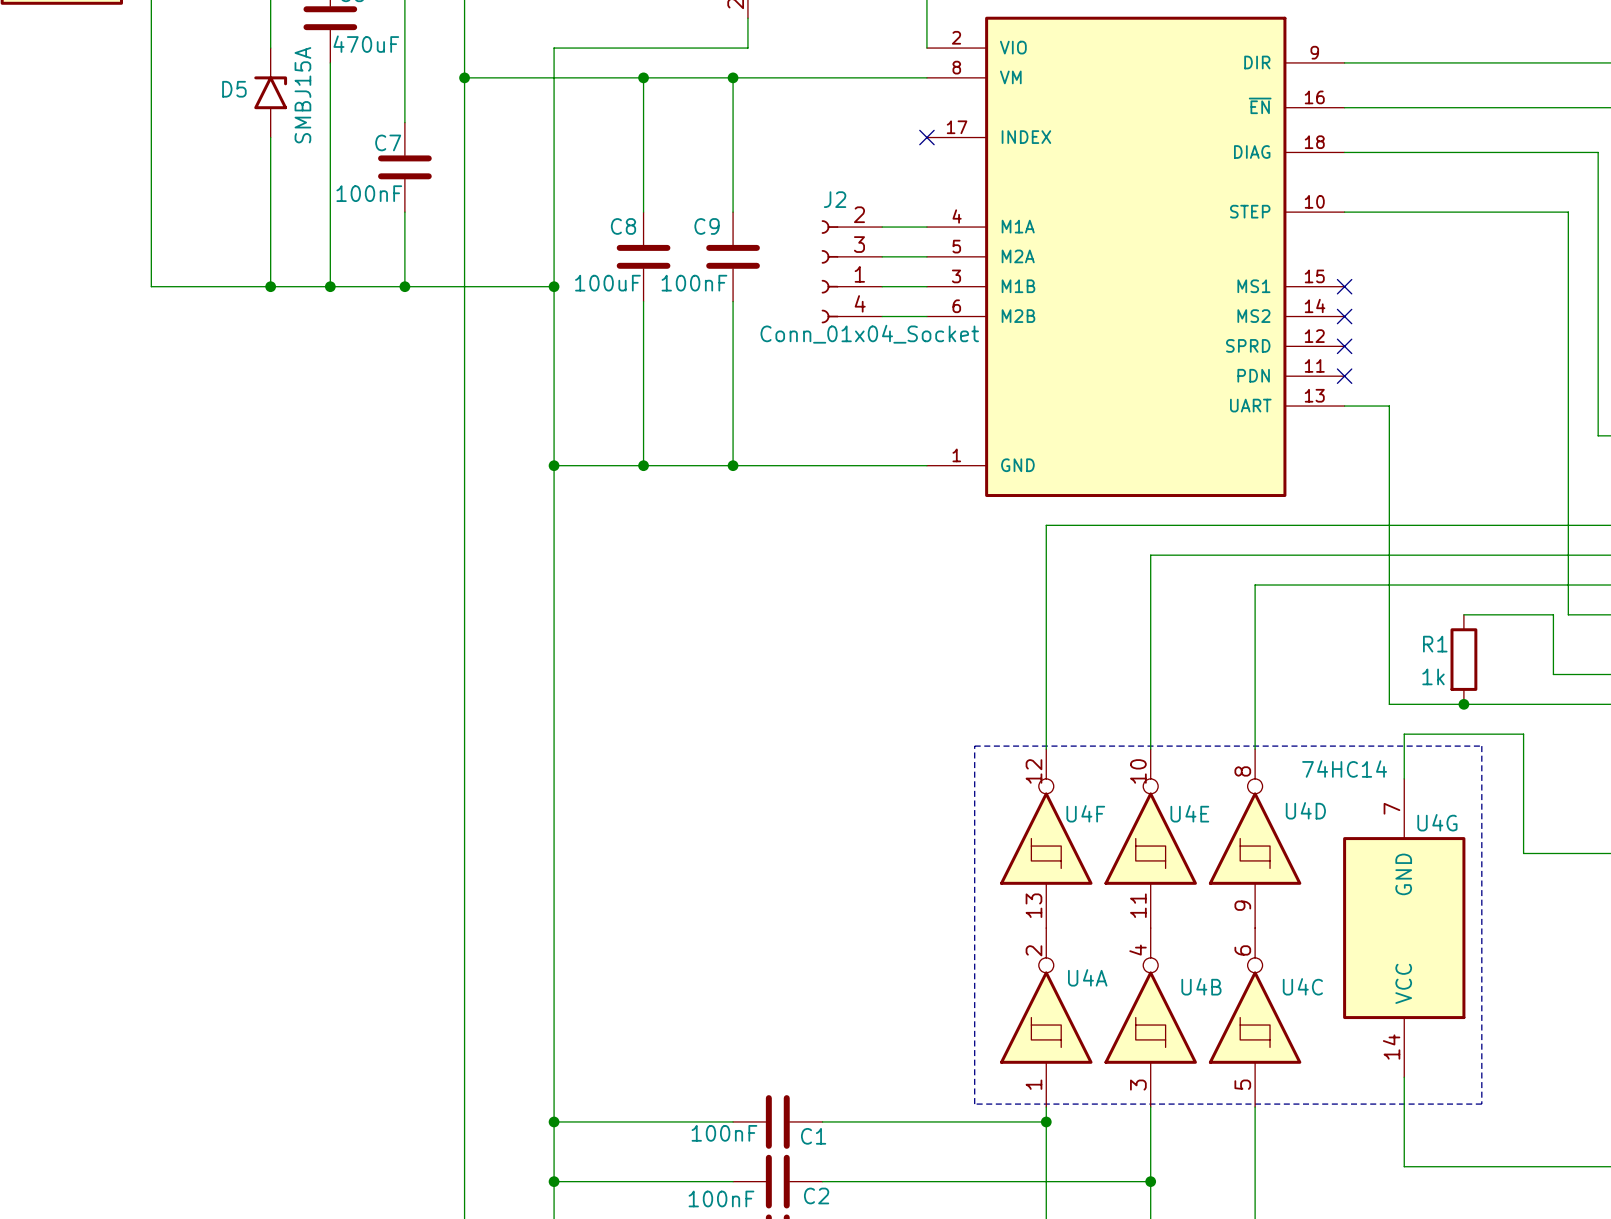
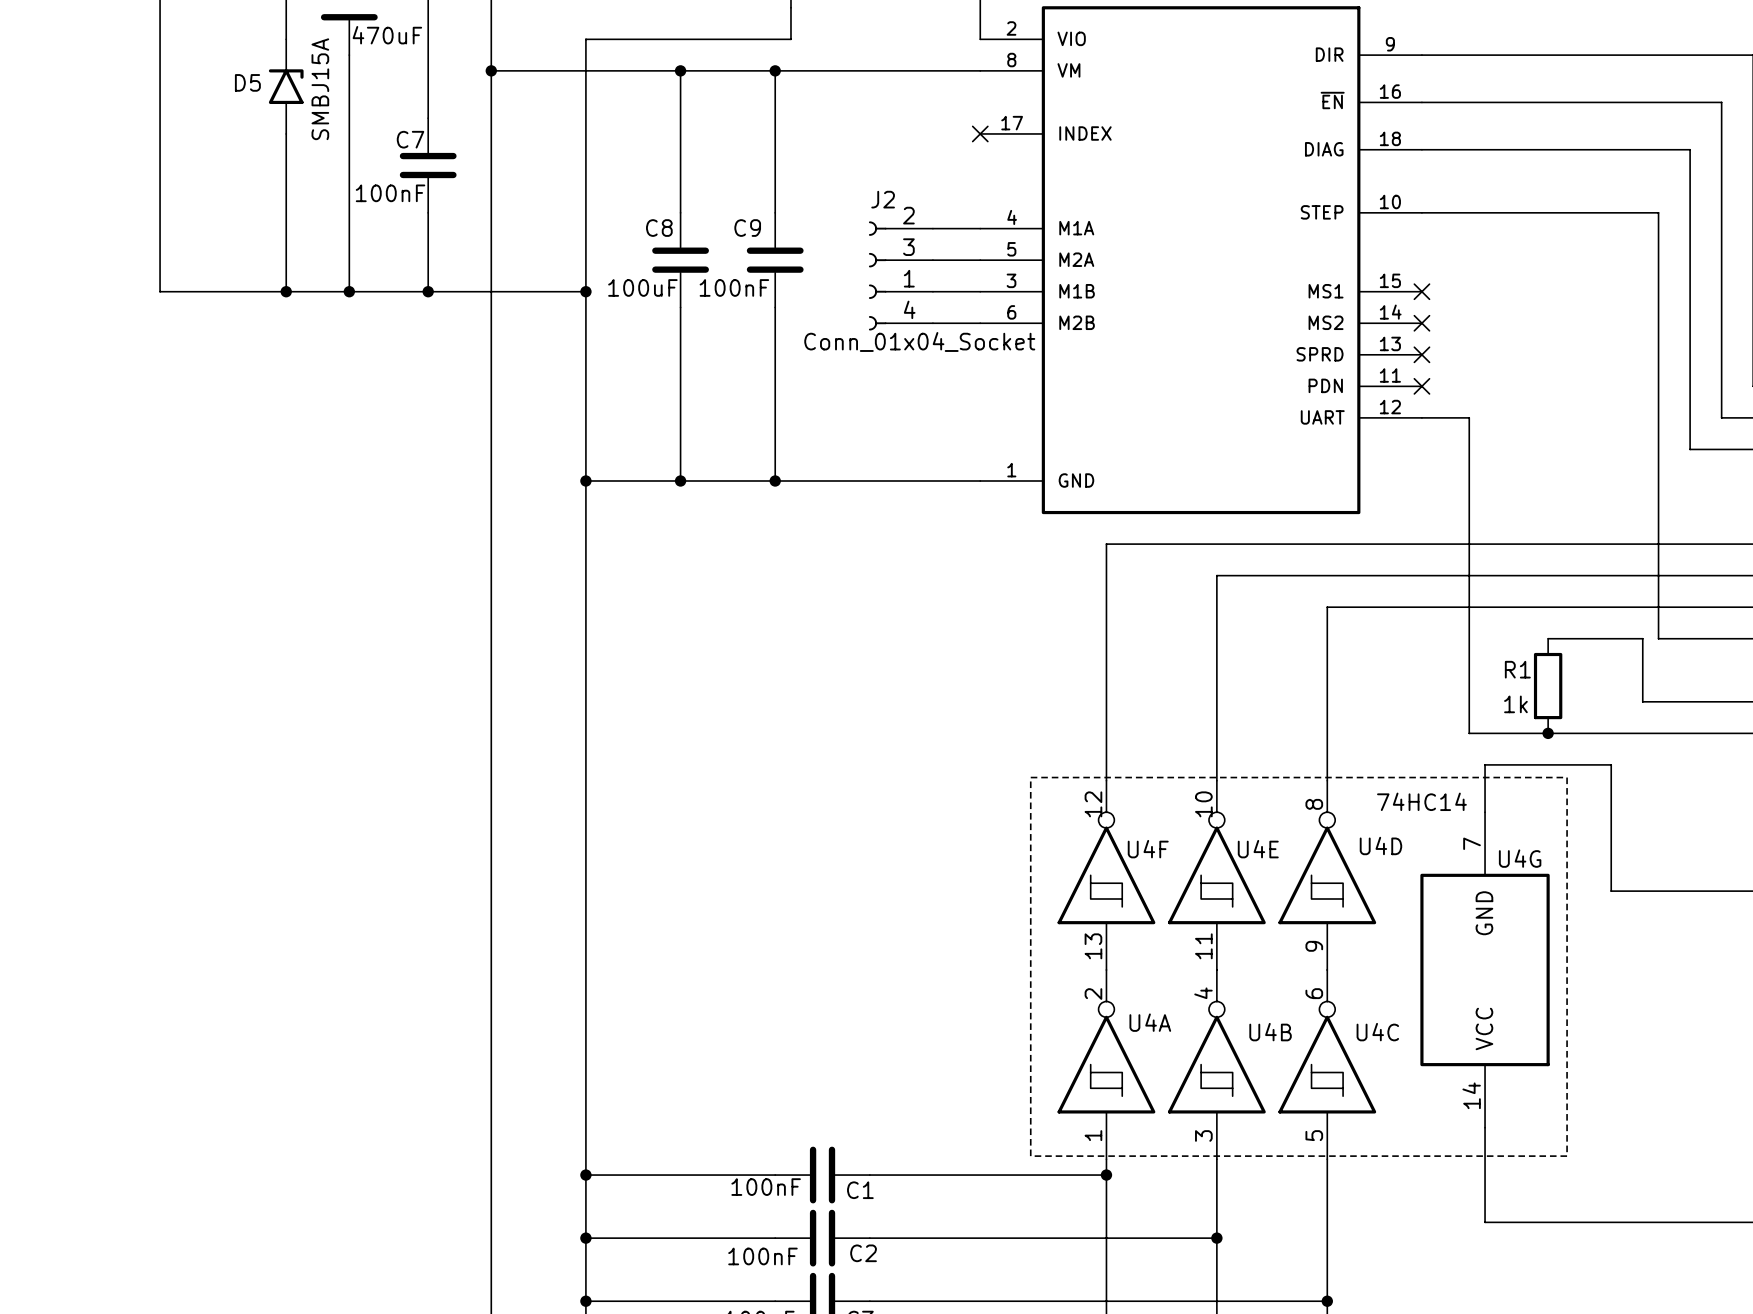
part pin number: 12 (1314, 336) -> 13 (1390, 343)
part pin number: 13 (1314, 395) -> 12 (1390, 407)

